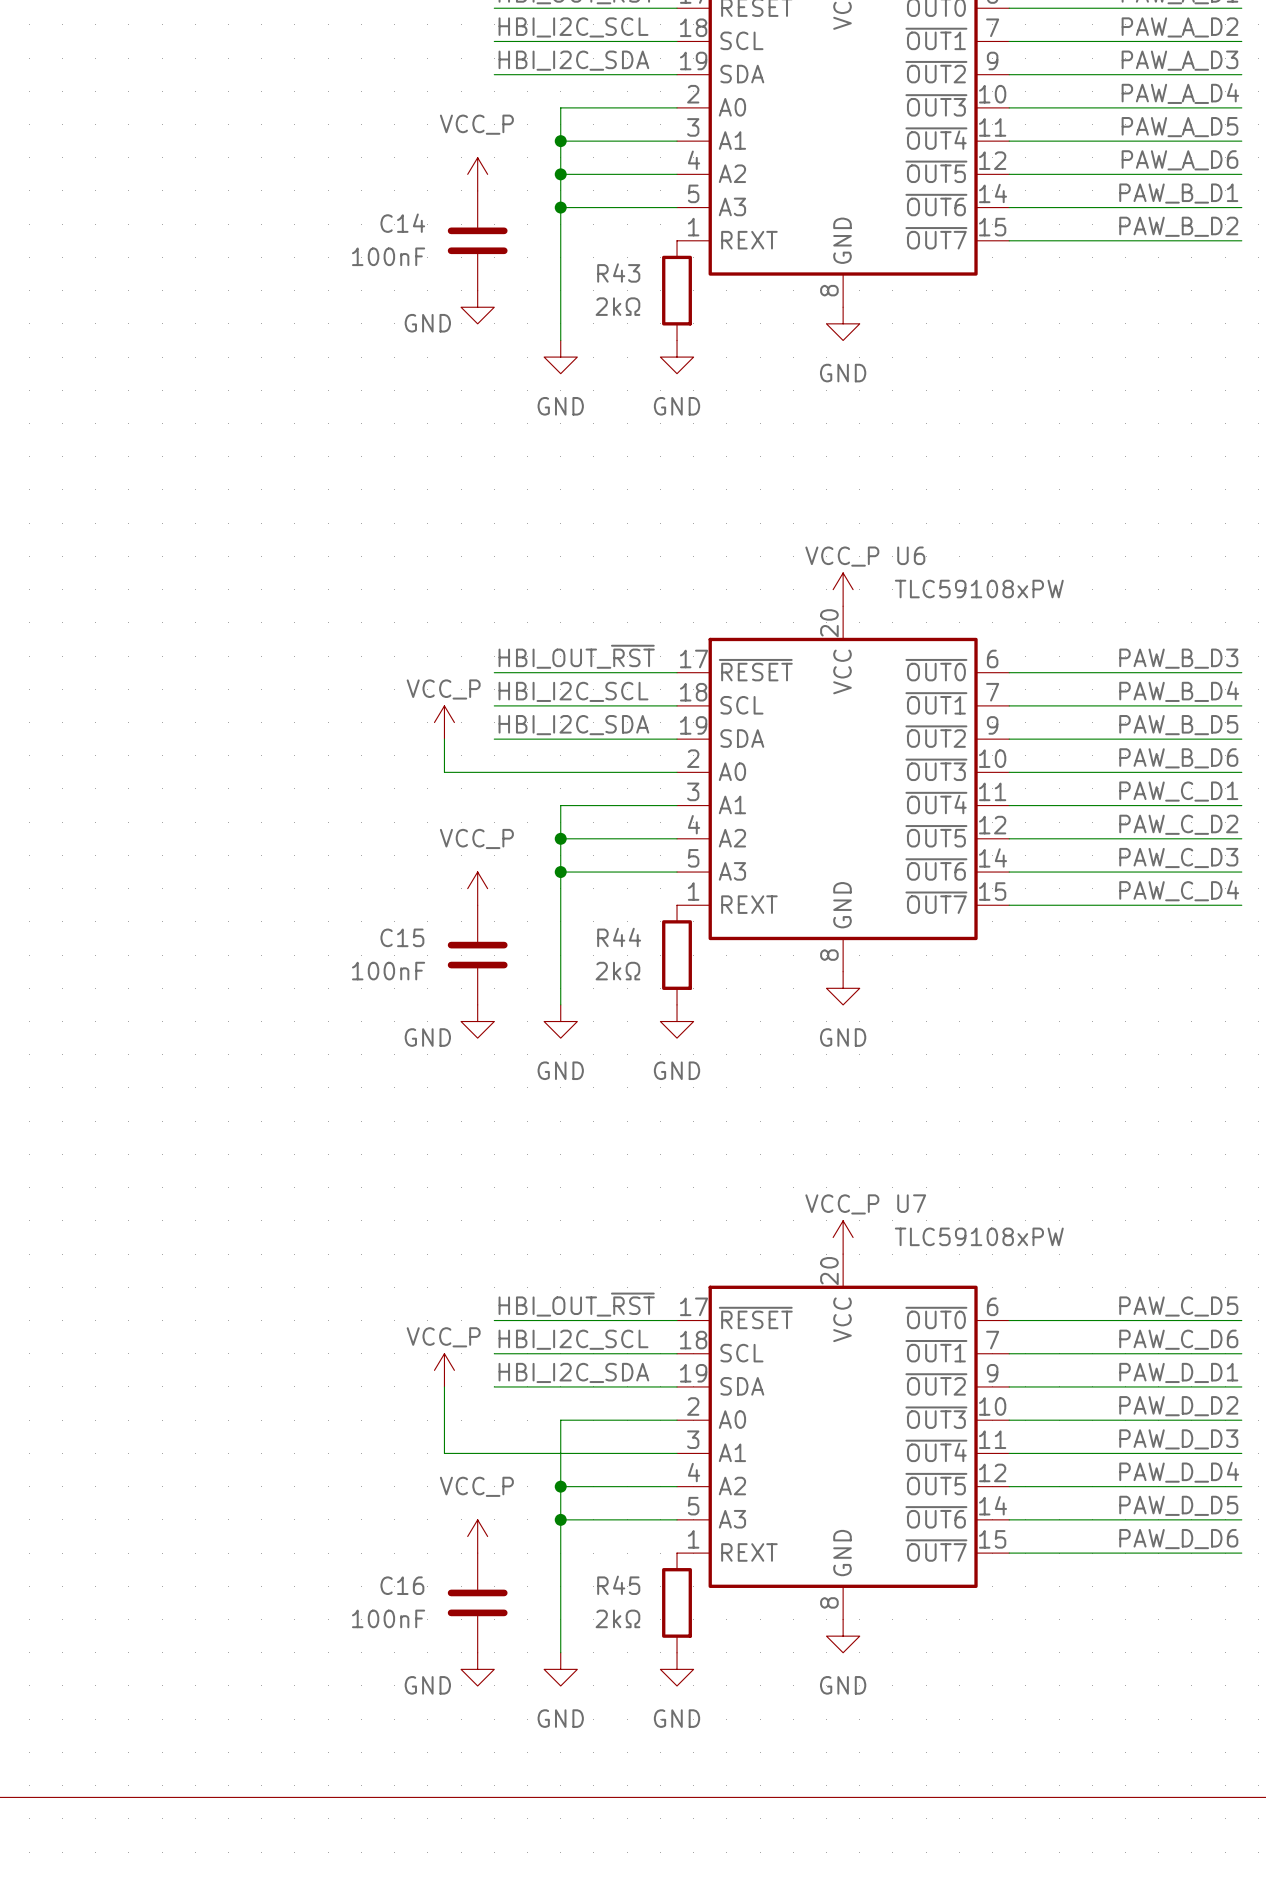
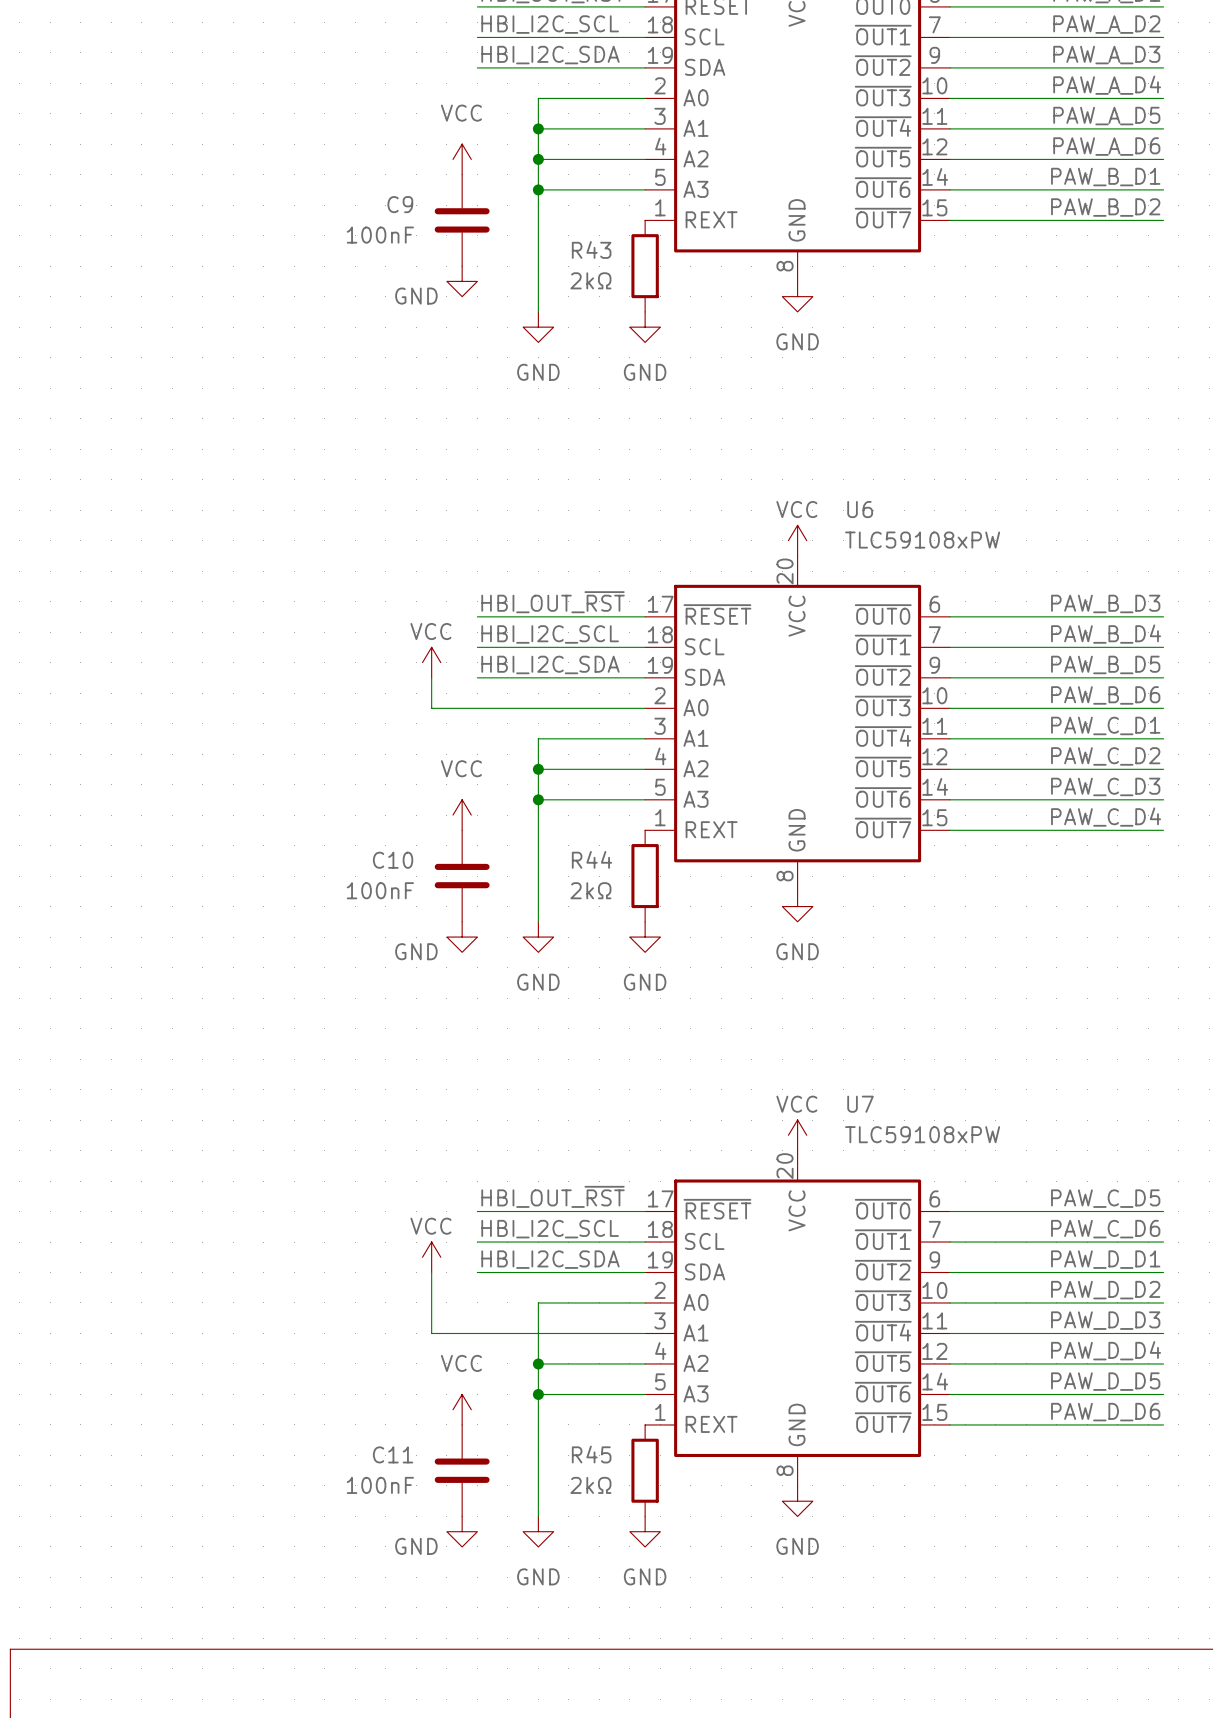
power symbol: VCC_P (477, 174) -> VCC (462, 159)
C14 name: C14 (402, 223) -> C9 (400, 204)
power symbol: VCC_P (843, 589) -> VCC (797, 540)
power symbol: VCC_P (444, 722) -> VCC (431, 662)
power symbol: VCC_P (477, 888) -> VCC (462, 815)
C15 name: C15 (402, 937) -> C10 (393, 860)
power symbol: VCC_P (843, 1237) -> VCC (797, 1135)
power symbol: VCC_P (444, 1370) -> VCC (431, 1257)
power symbol: VCC_P (477, 1536) -> VCC (462, 1409)
C16 name: C16 (402, 1585) -> C11 (393, 1454)

